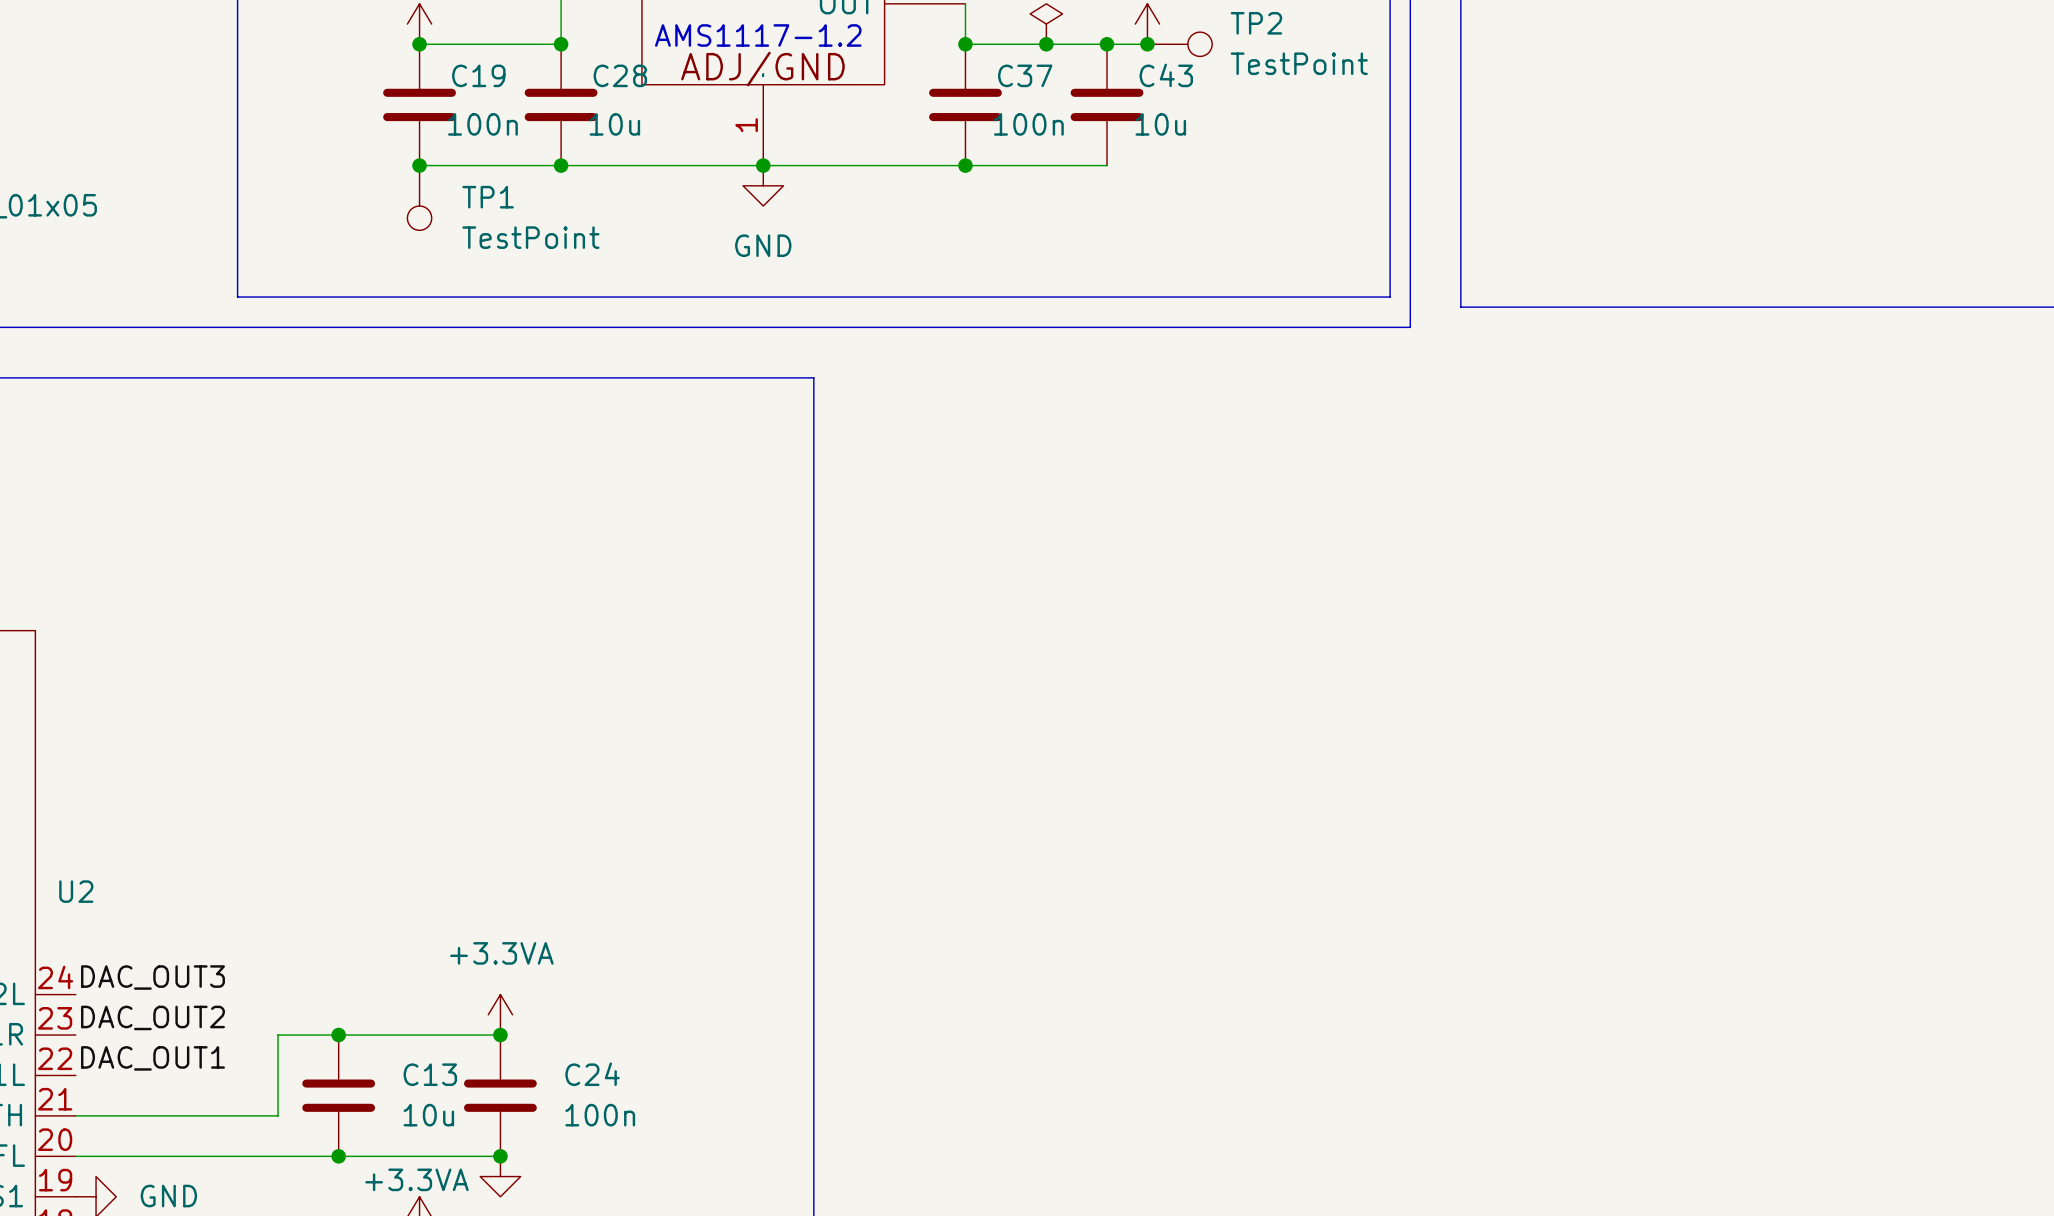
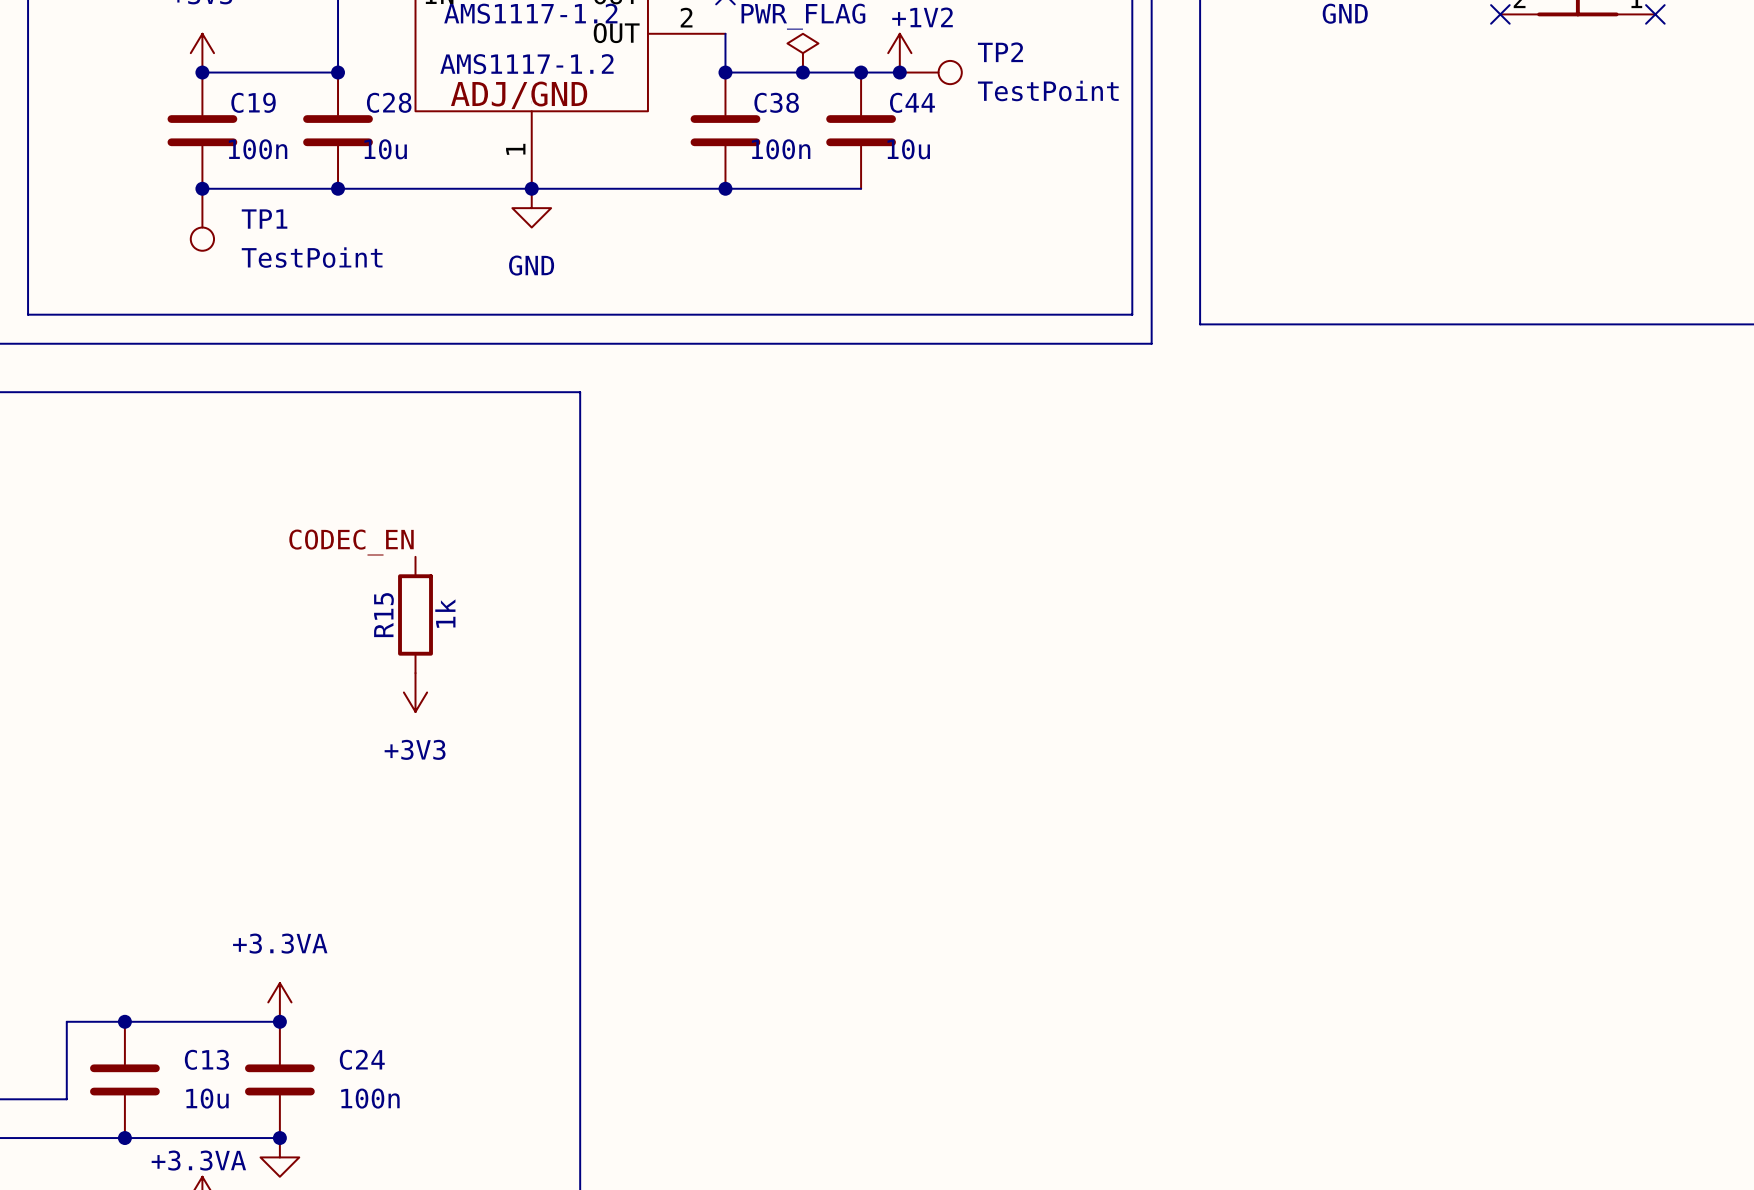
C37 name: C37 (1025, 75) -> C38 (776, 102)
C43 name: C43 (1166, 75) -> C44 (912, 102)
label: none -> CODEC_EN (351, 542)
R15: none -> 1k (415, 614)
power symbol: none -> +3V3 (415, 692)

